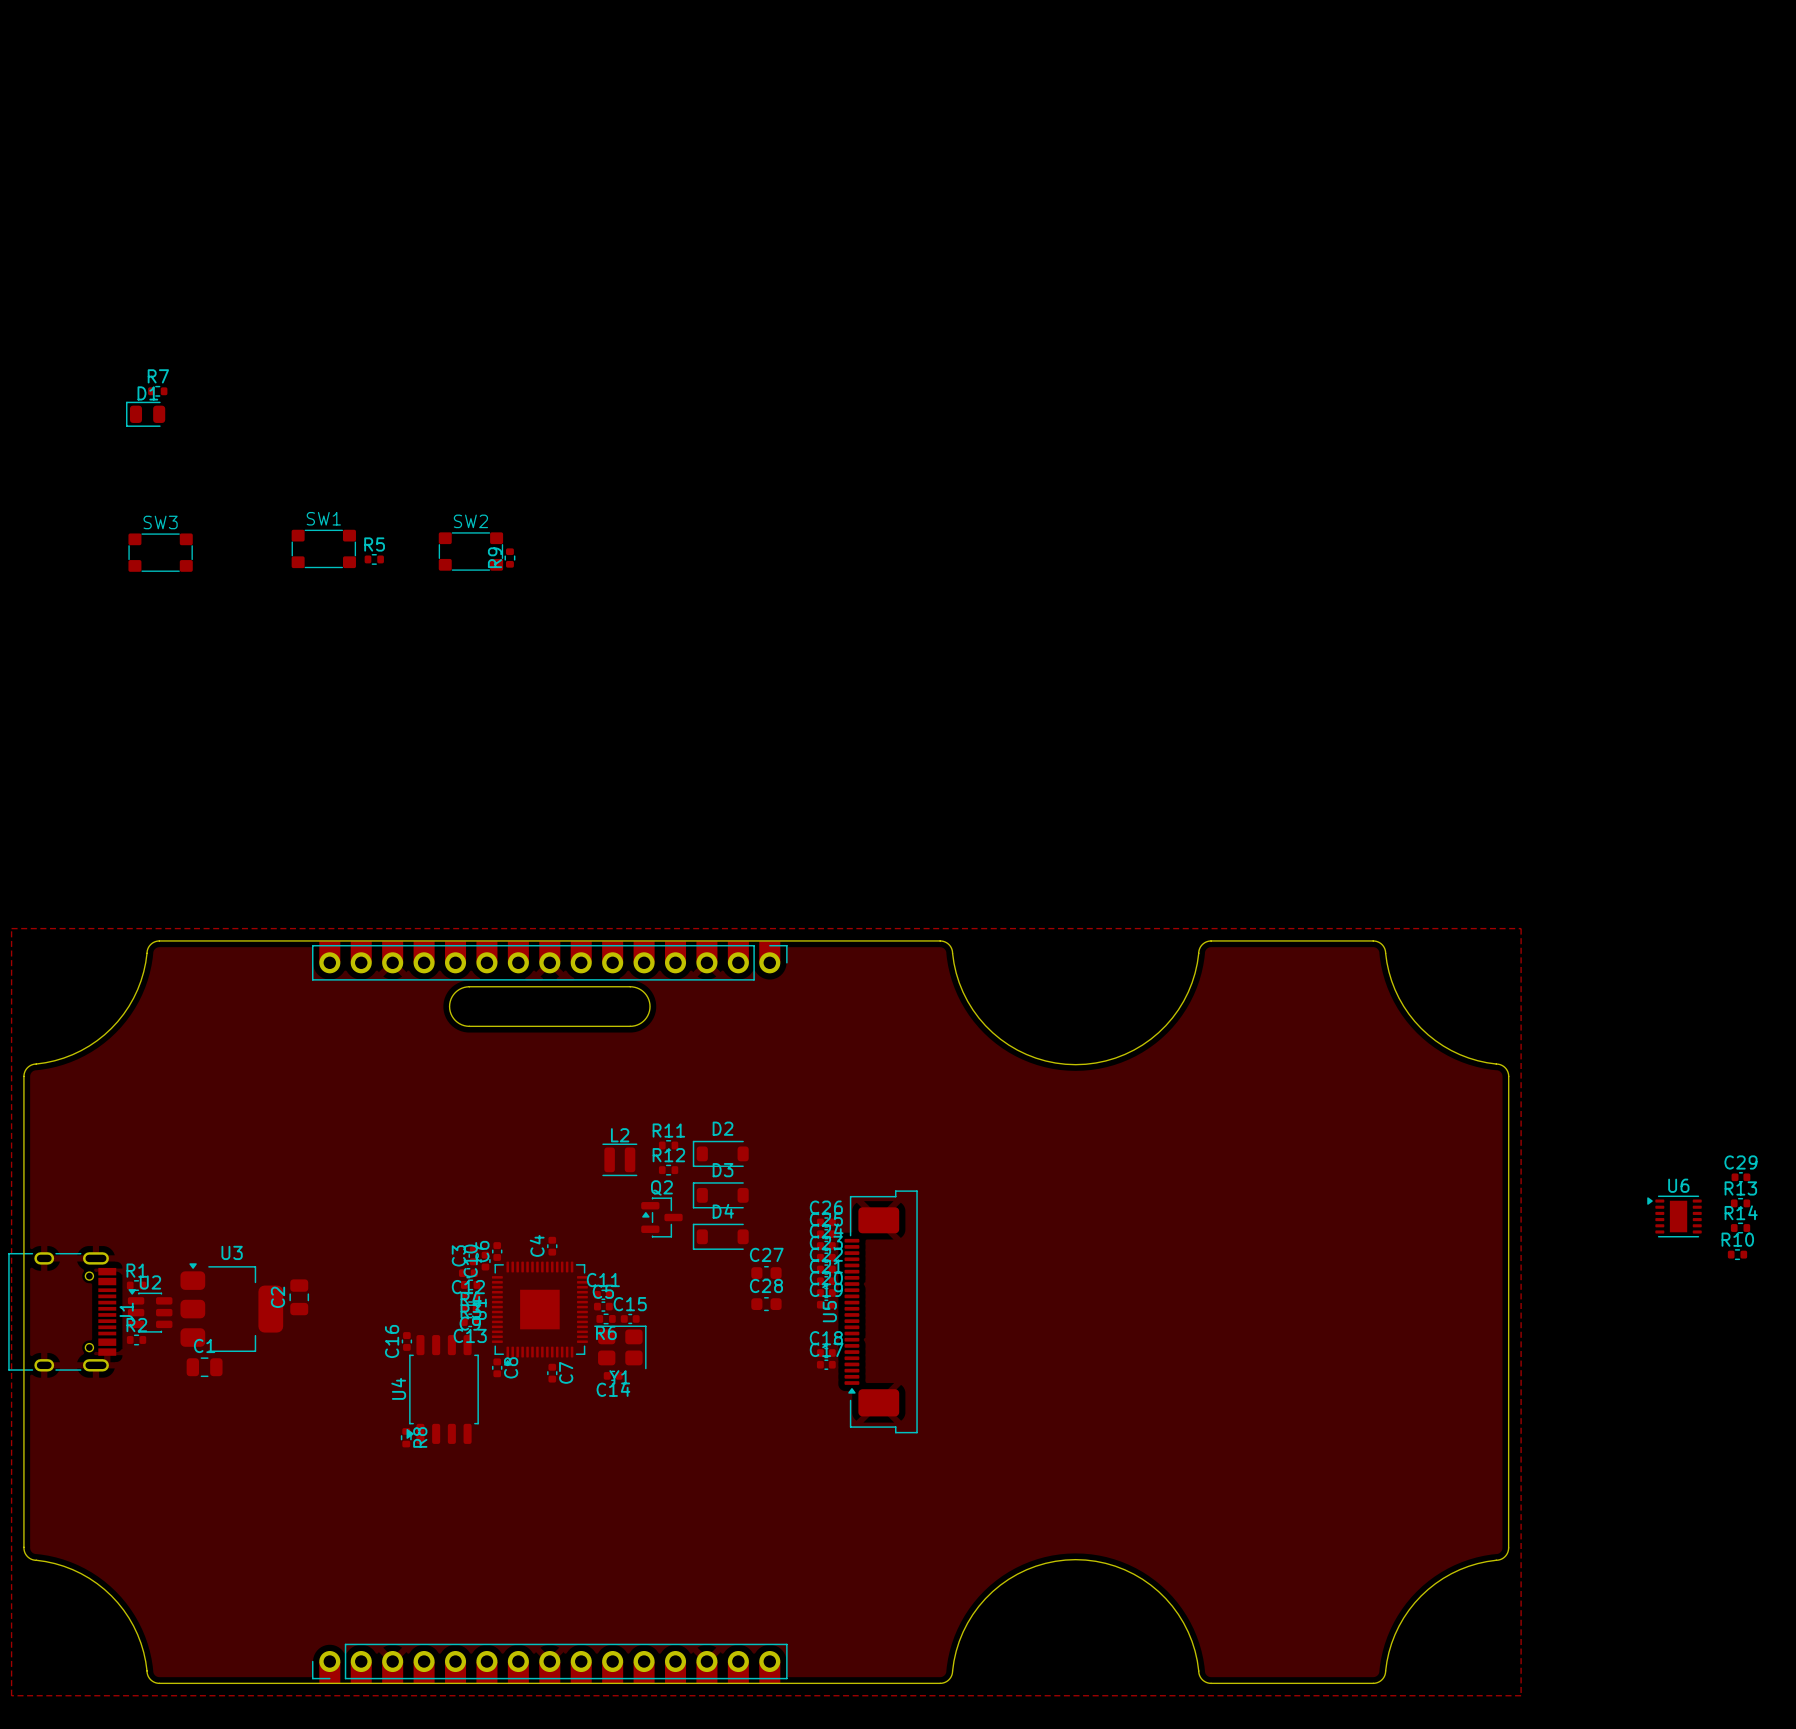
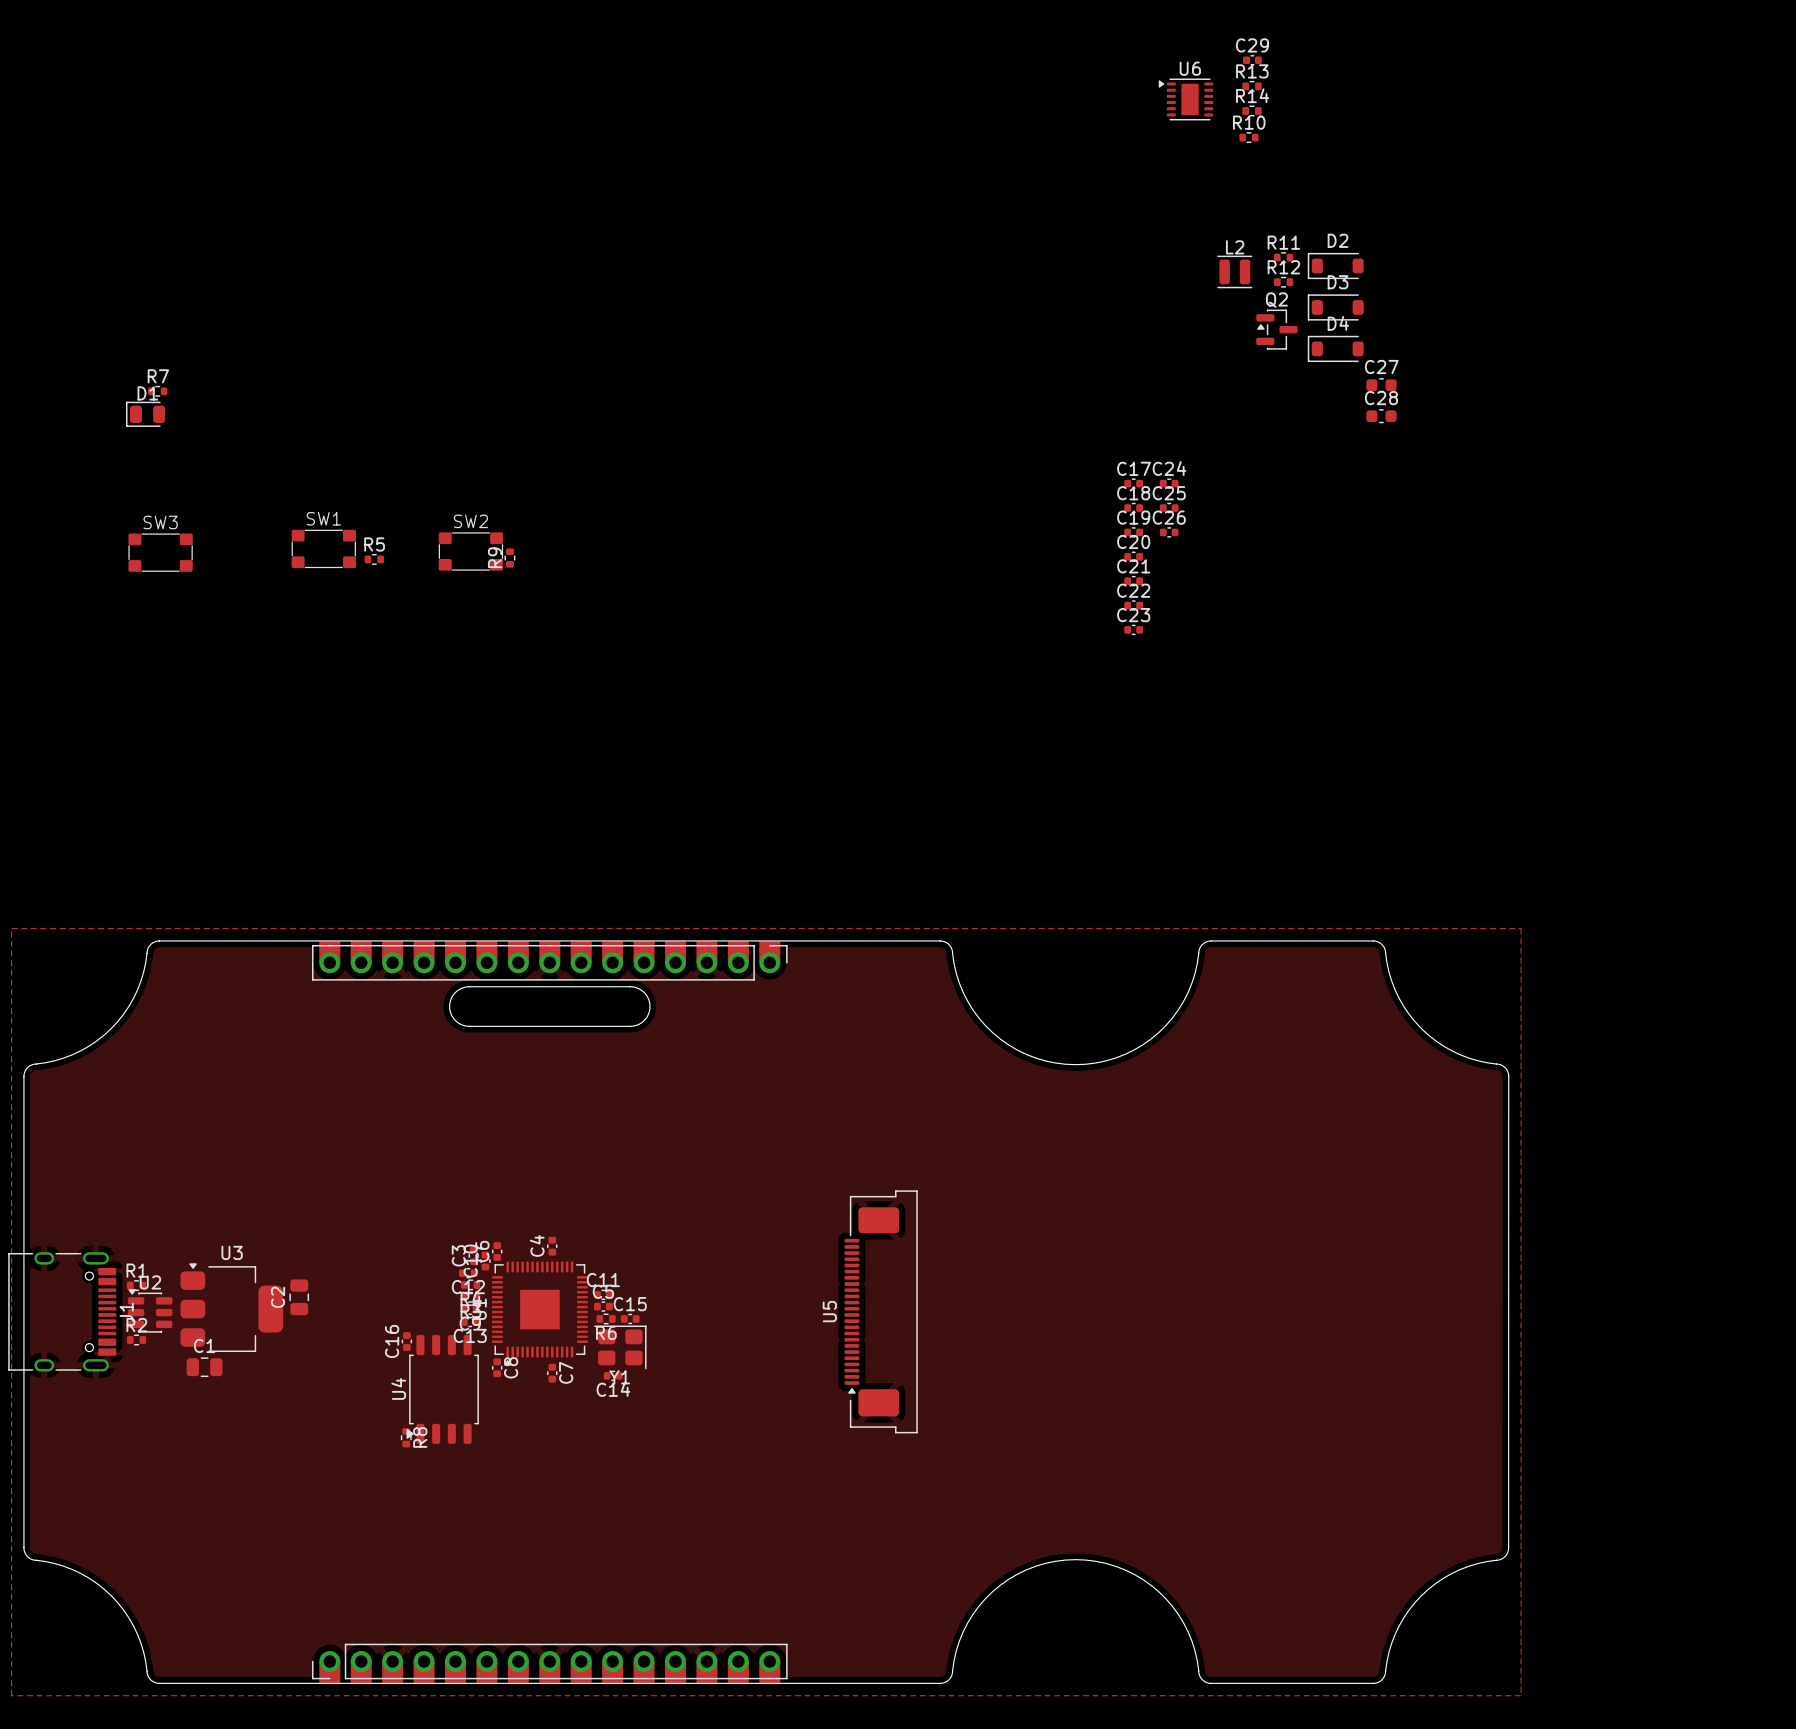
R11 position: (668, 1145) -> (1283, 257)
D2 position: (720, 1153) -> (1335, 266)
L2 position: (619, 1159) -> (1234, 271)
R12 position: (668, 1170) -> (1283, 282)
C29 position: (1740, 1177) -> (1252, 60)
D3 position: (720, 1195) -> (1335, 307)
R13 position: (1740, 1203) -> (1252, 86)
U6 position: (1674, 1216) -> (1185, 99)
Q2 position: (661, 1217) -> (1276, 329)
C26 position: (826, 1222) -> (1169, 532)
R14 position: (1740, 1228) -> (1252, 110)
C25 position: (826, 1234) -> (1169, 508)
D4 position: (720, 1236) -> (1335, 348)
C24 position: (826, 1245) -> (1169, 483)
R10 position: (1737, 1254) -> (1248, 137)
C23 position: (826, 1257) -> (1133, 629)
C22 position: (826, 1269) -> (1133, 605)
C27 position: (766, 1273) -> (1381, 385)
C21 position: (826, 1281) -> (1133, 581)
C20 position: (826, 1292) -> (1133, 556)
C28 position: (766, 1304) -> (1381, 416)
C19 position: (826, 1304) -> (1133, 532)
C18 position: (826, 1352) -> (1133, 508)
C17 position: (826, 1364) -> (1133, 483)

